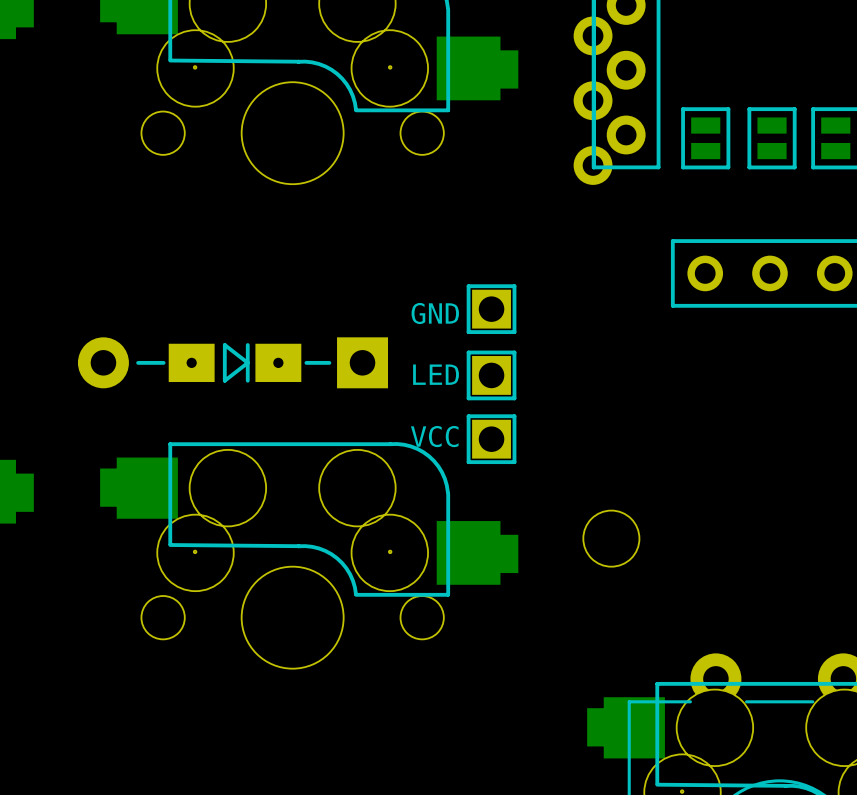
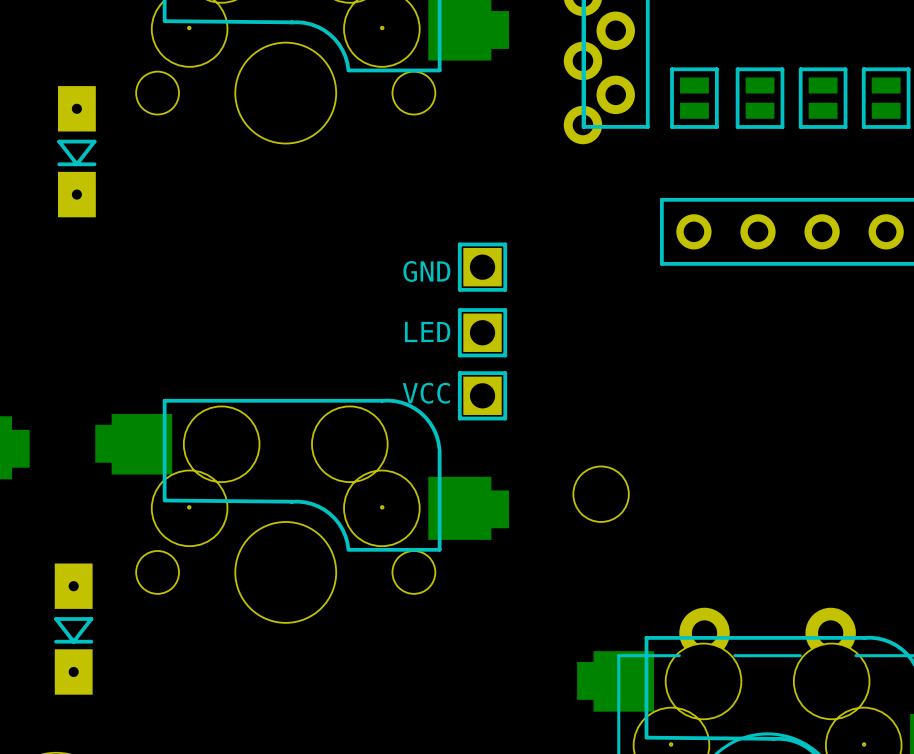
part: none -> (76, 151)
part: (232, 362) -> none
part: none -> (73, 629)

